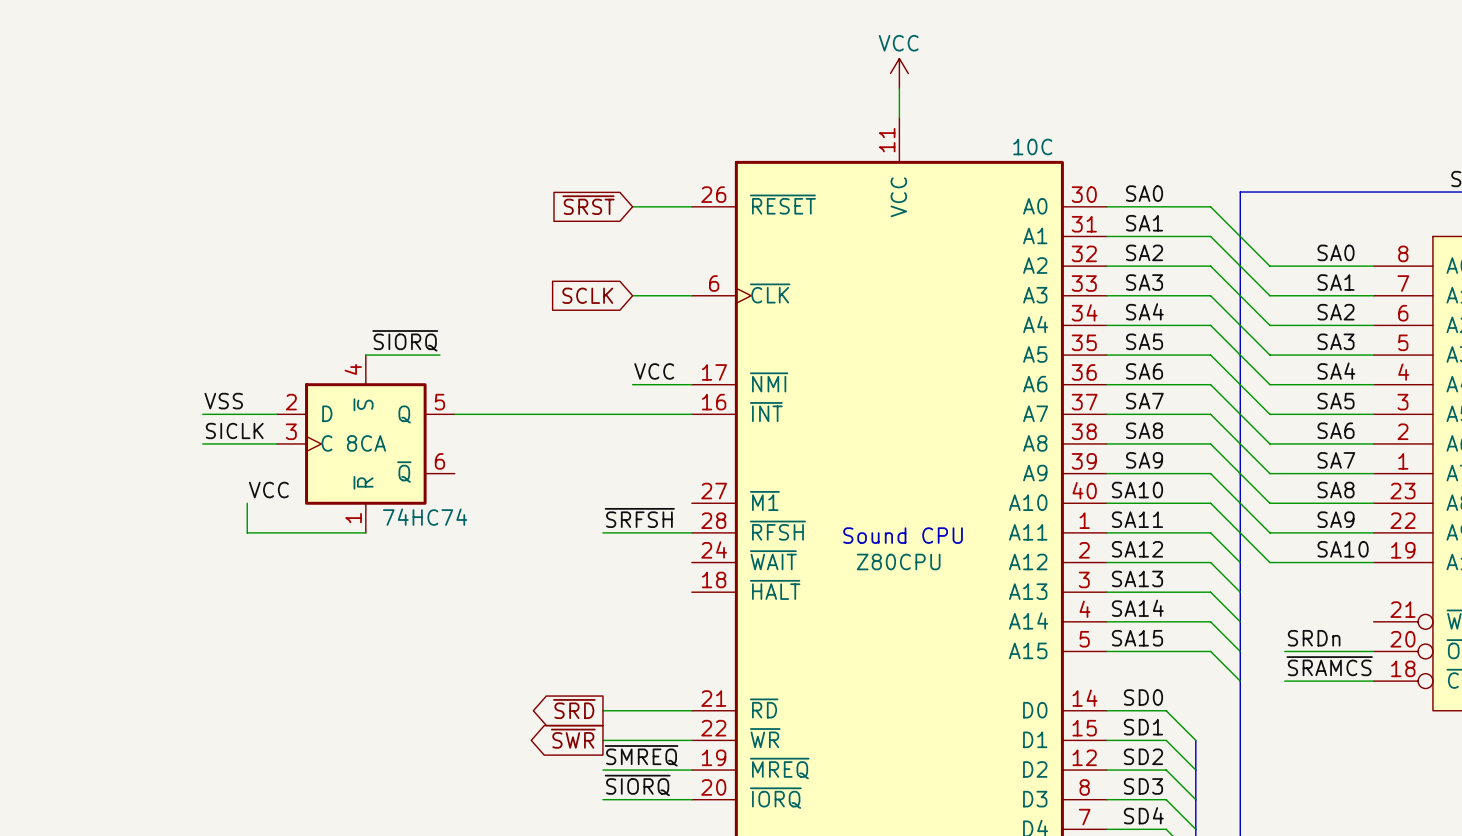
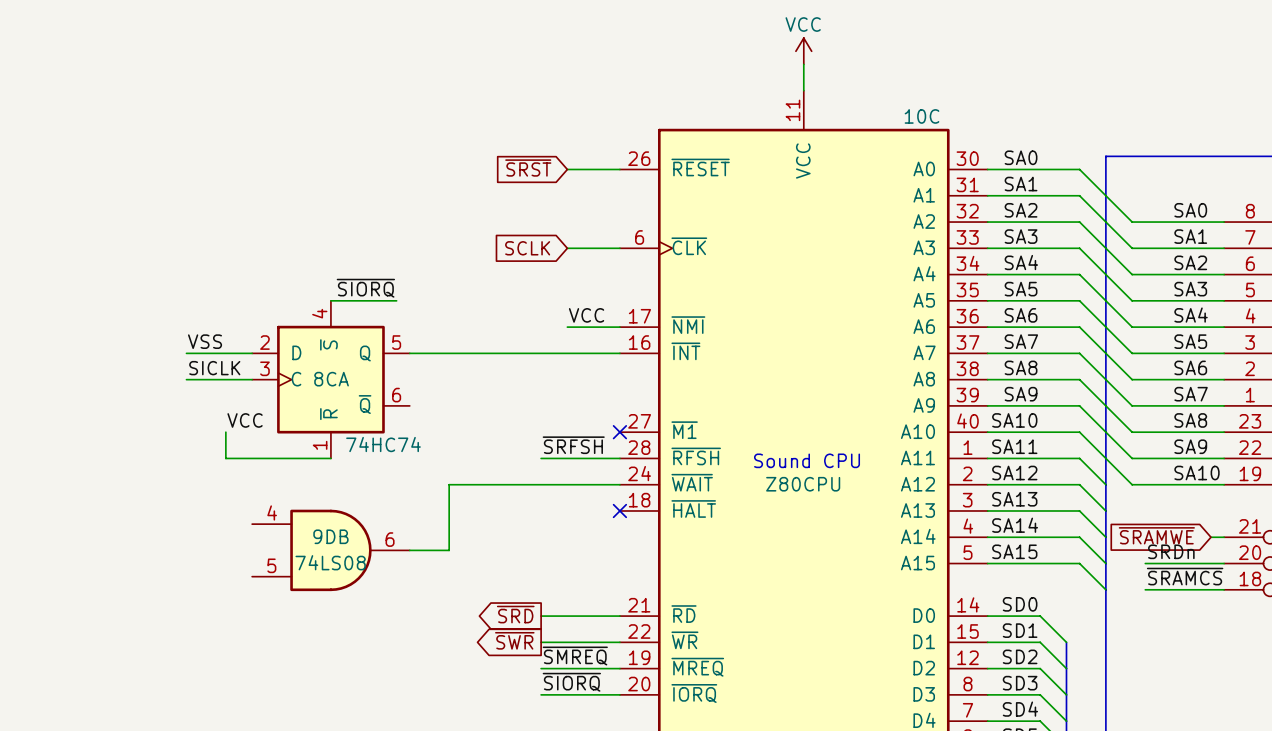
no-connect mark: none -> (619, 432)
wire: none -> (619, 484) (449, 484) (449, 550) (409, 550)
no-connect mark: none -> (619, 510)
global label: none -> ~{SRAMWE} (1156, 535)
wire: none -> (1210, 537) (1224, 537)
9DB: none -> 74LS08 (330, 550)

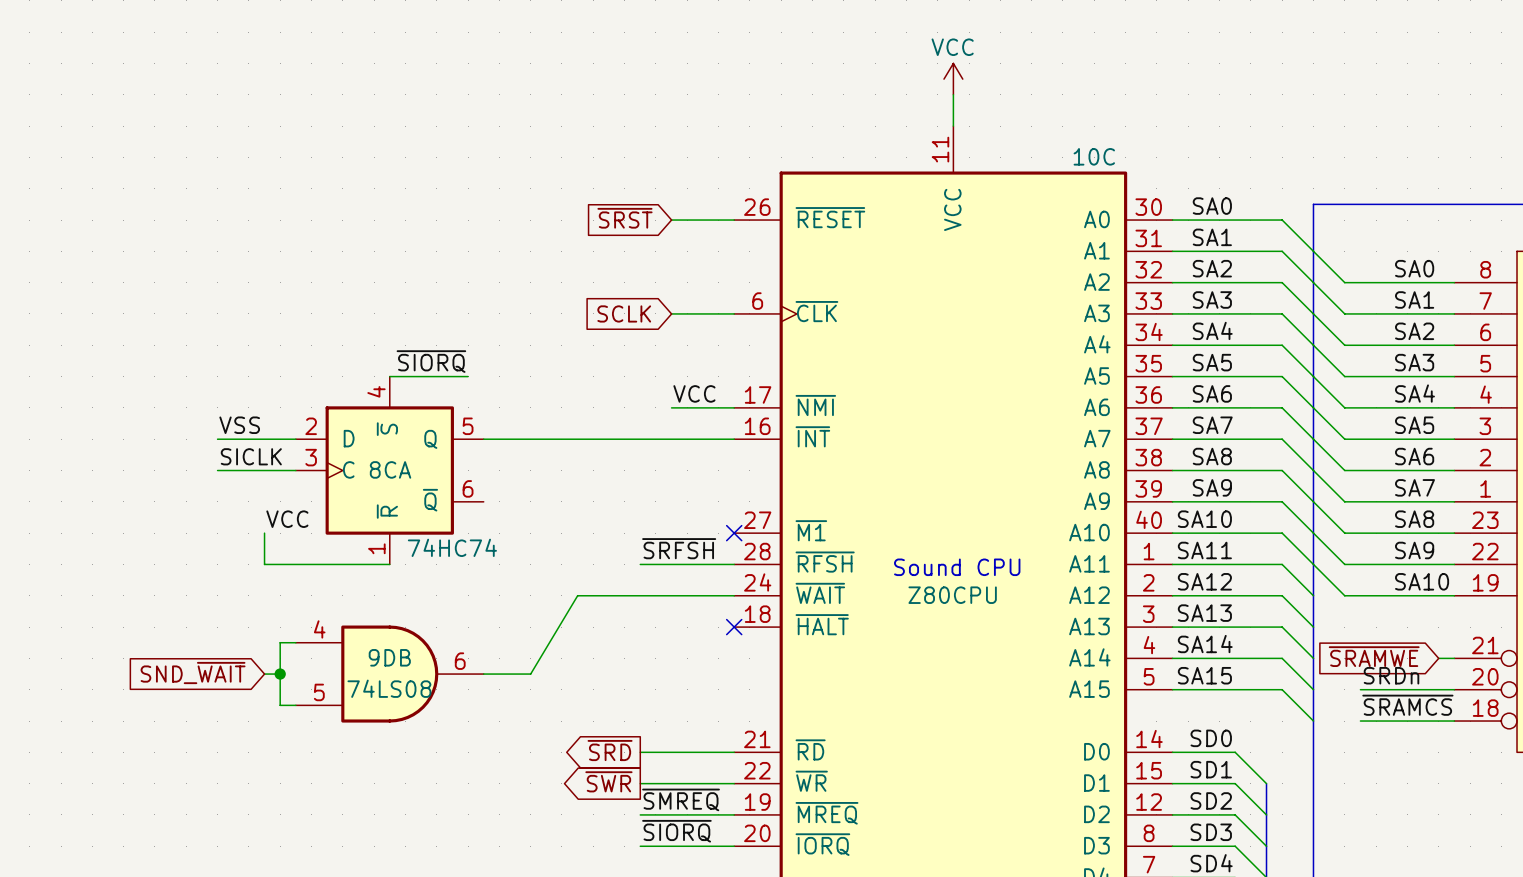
wire: (488, 484) (449, 484) (449, 550) -> (577, 595) (530, 674)
wire: none -> (295, 642) (280, 642) (280, 705) (295, 705)
global label: none -> SND_~{WAIT} (193, 673)
wire: none -> (264, 674) (280, 674)
junction: none -> (280, 674)

